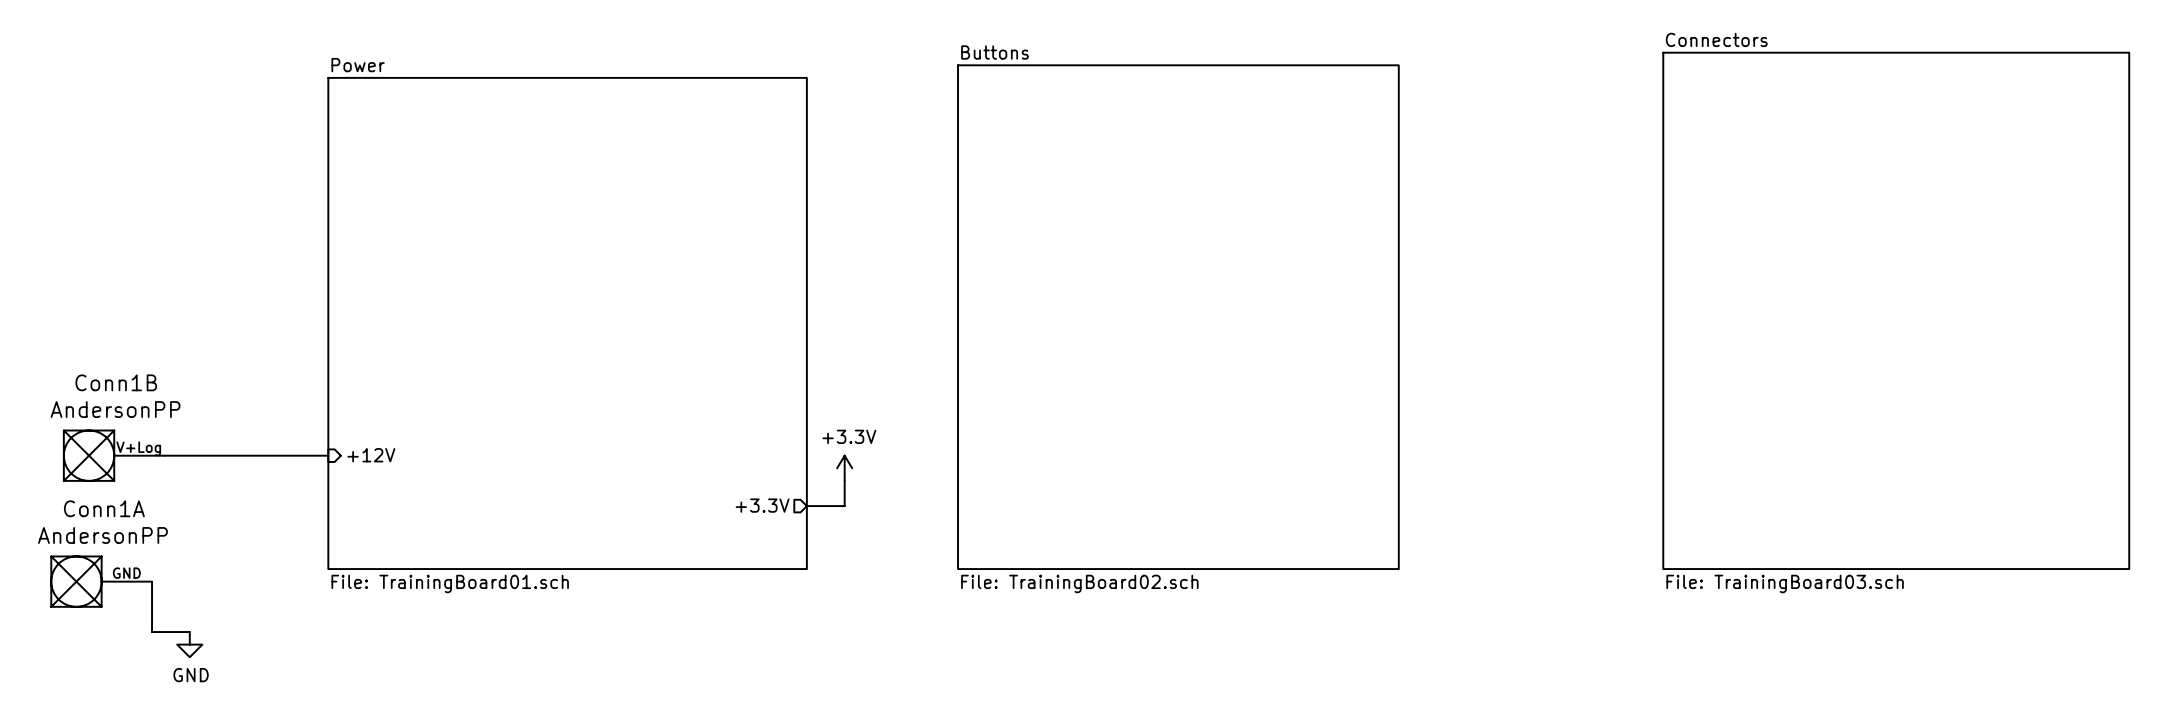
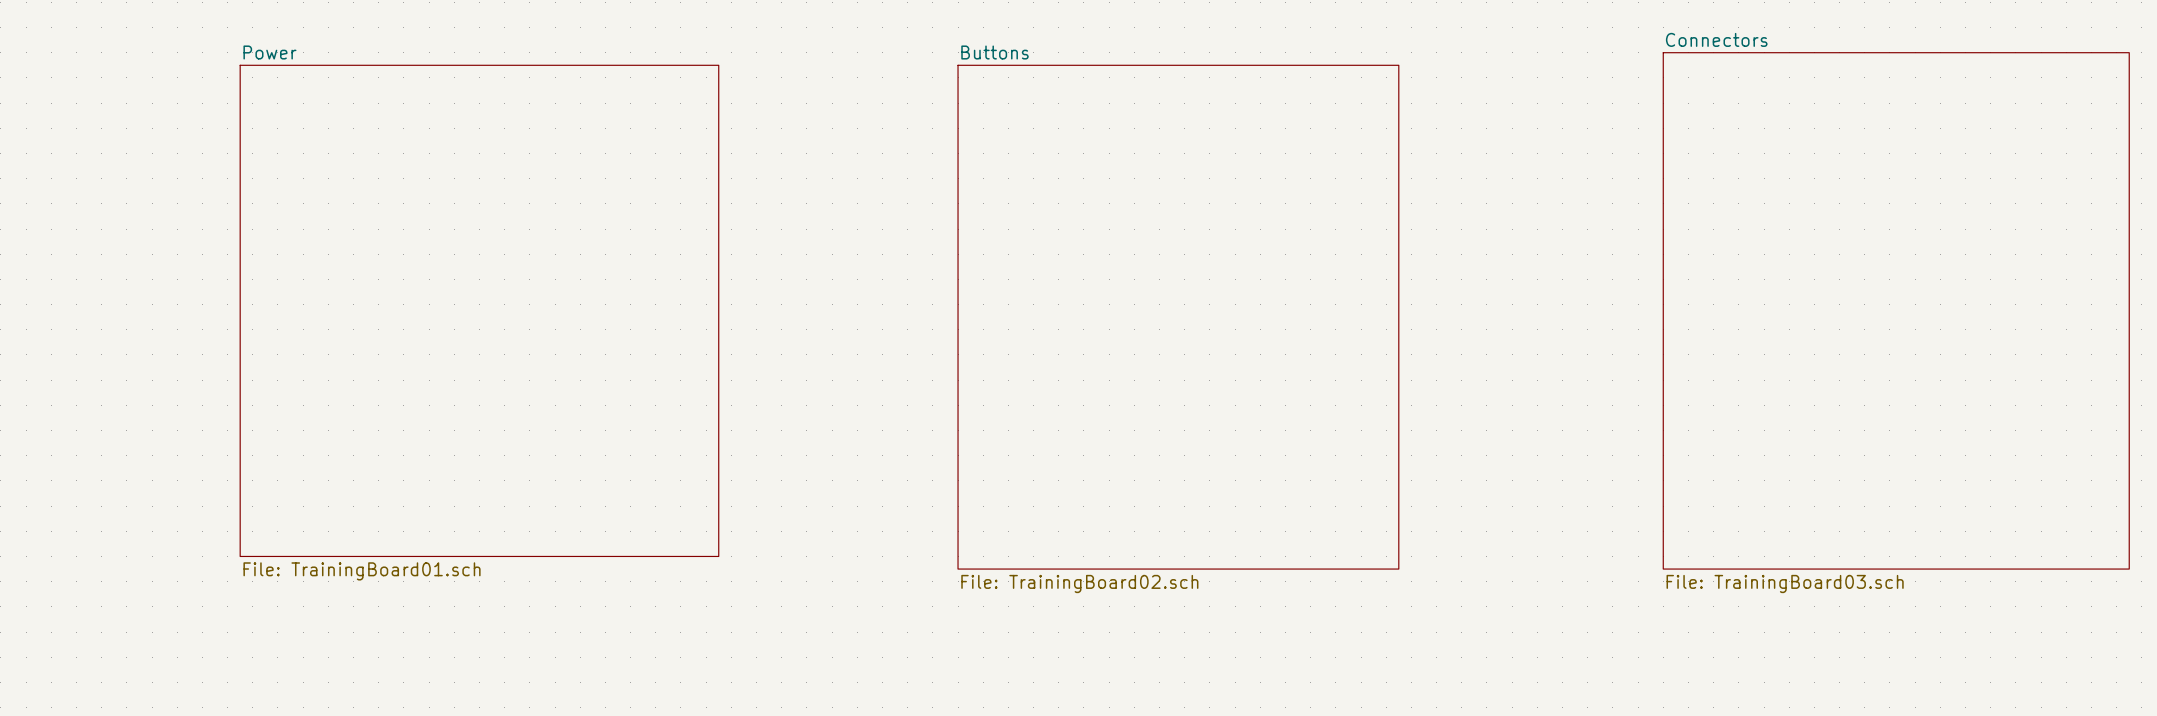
sheet Power position: (567, 323) -> (479, 310)
Conn1B: AndersonPP (114, 455) -> none
wire: (164, 455) (328, 455) -> none
sheet pin: +12V (371, 455) -> none
power symbol: +3.3V (844, 468) -> none
wire: (844, 480) (844, 506) (806, 506) -> none
sheet pin: +3.3V (762, 505) -> none
Conn1A: AndersonPP (101, 581) -> none
wire: (152, 581) (152, 632) (189, 632) -> none
power symbol: GND (189, 644) -> none

